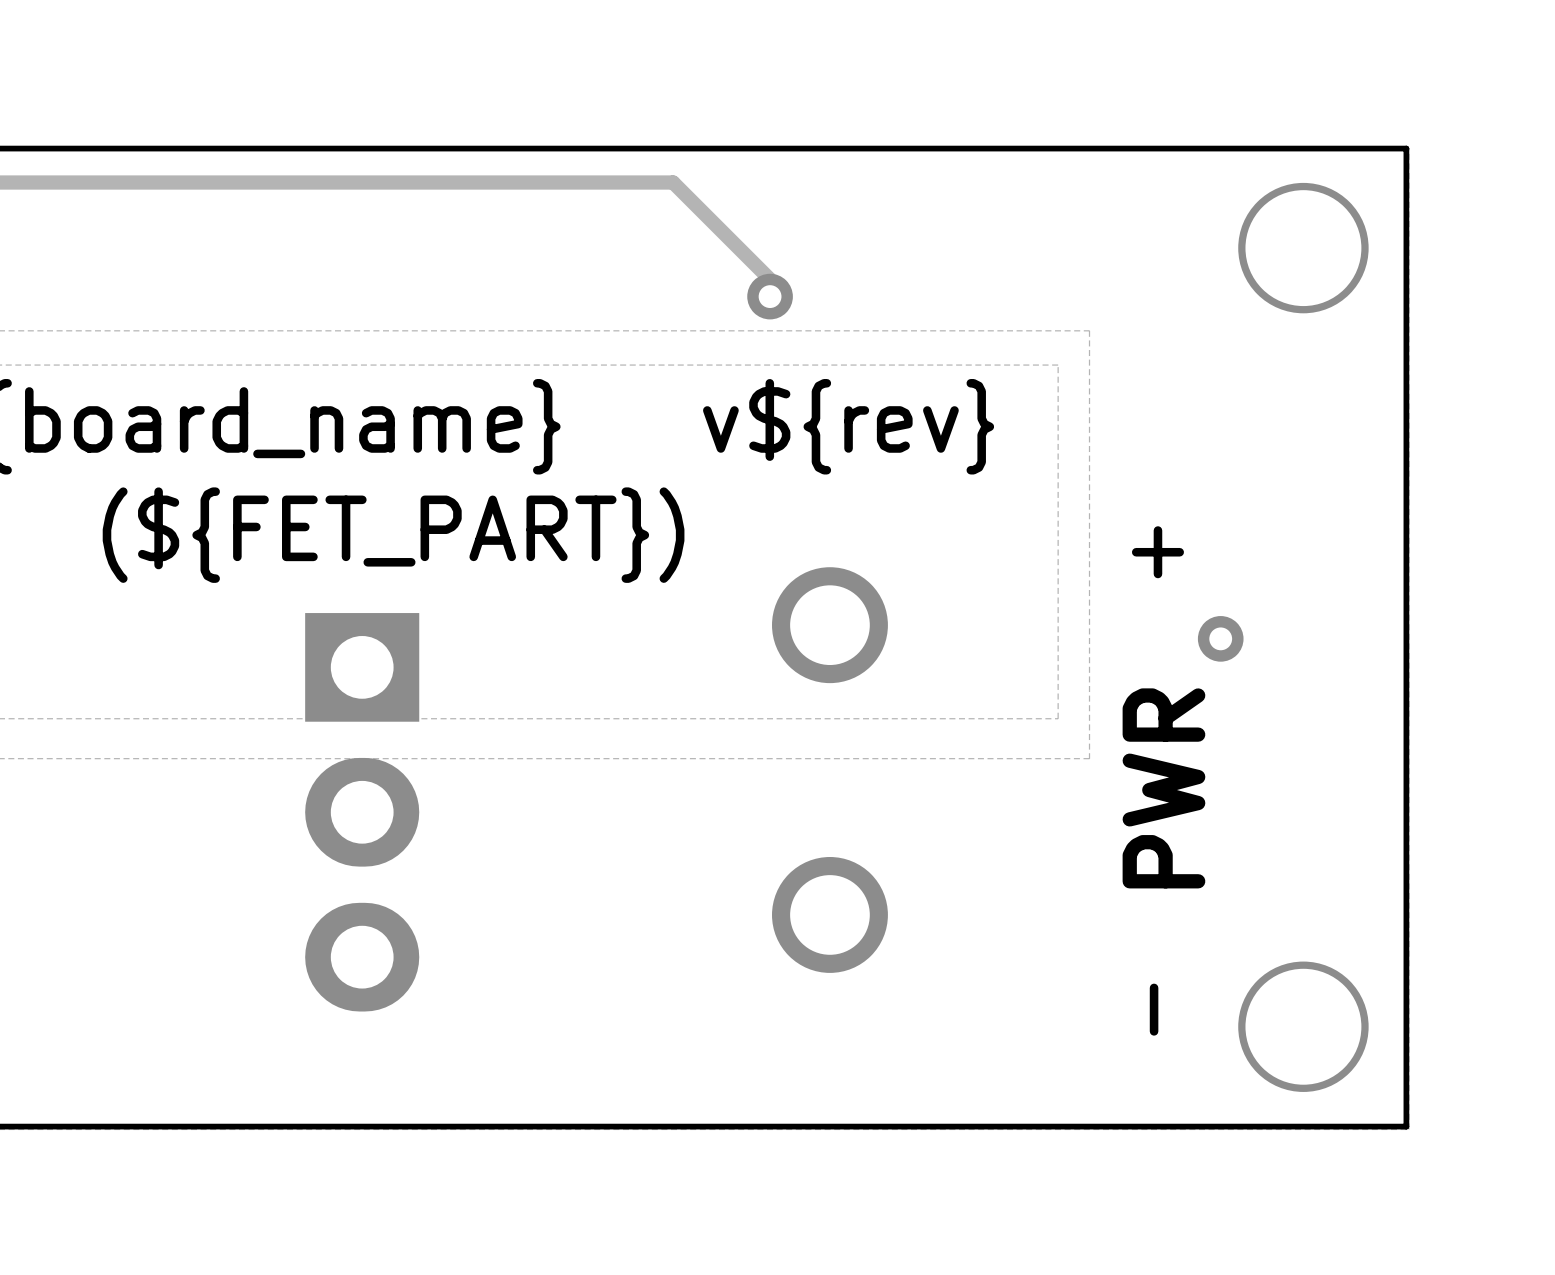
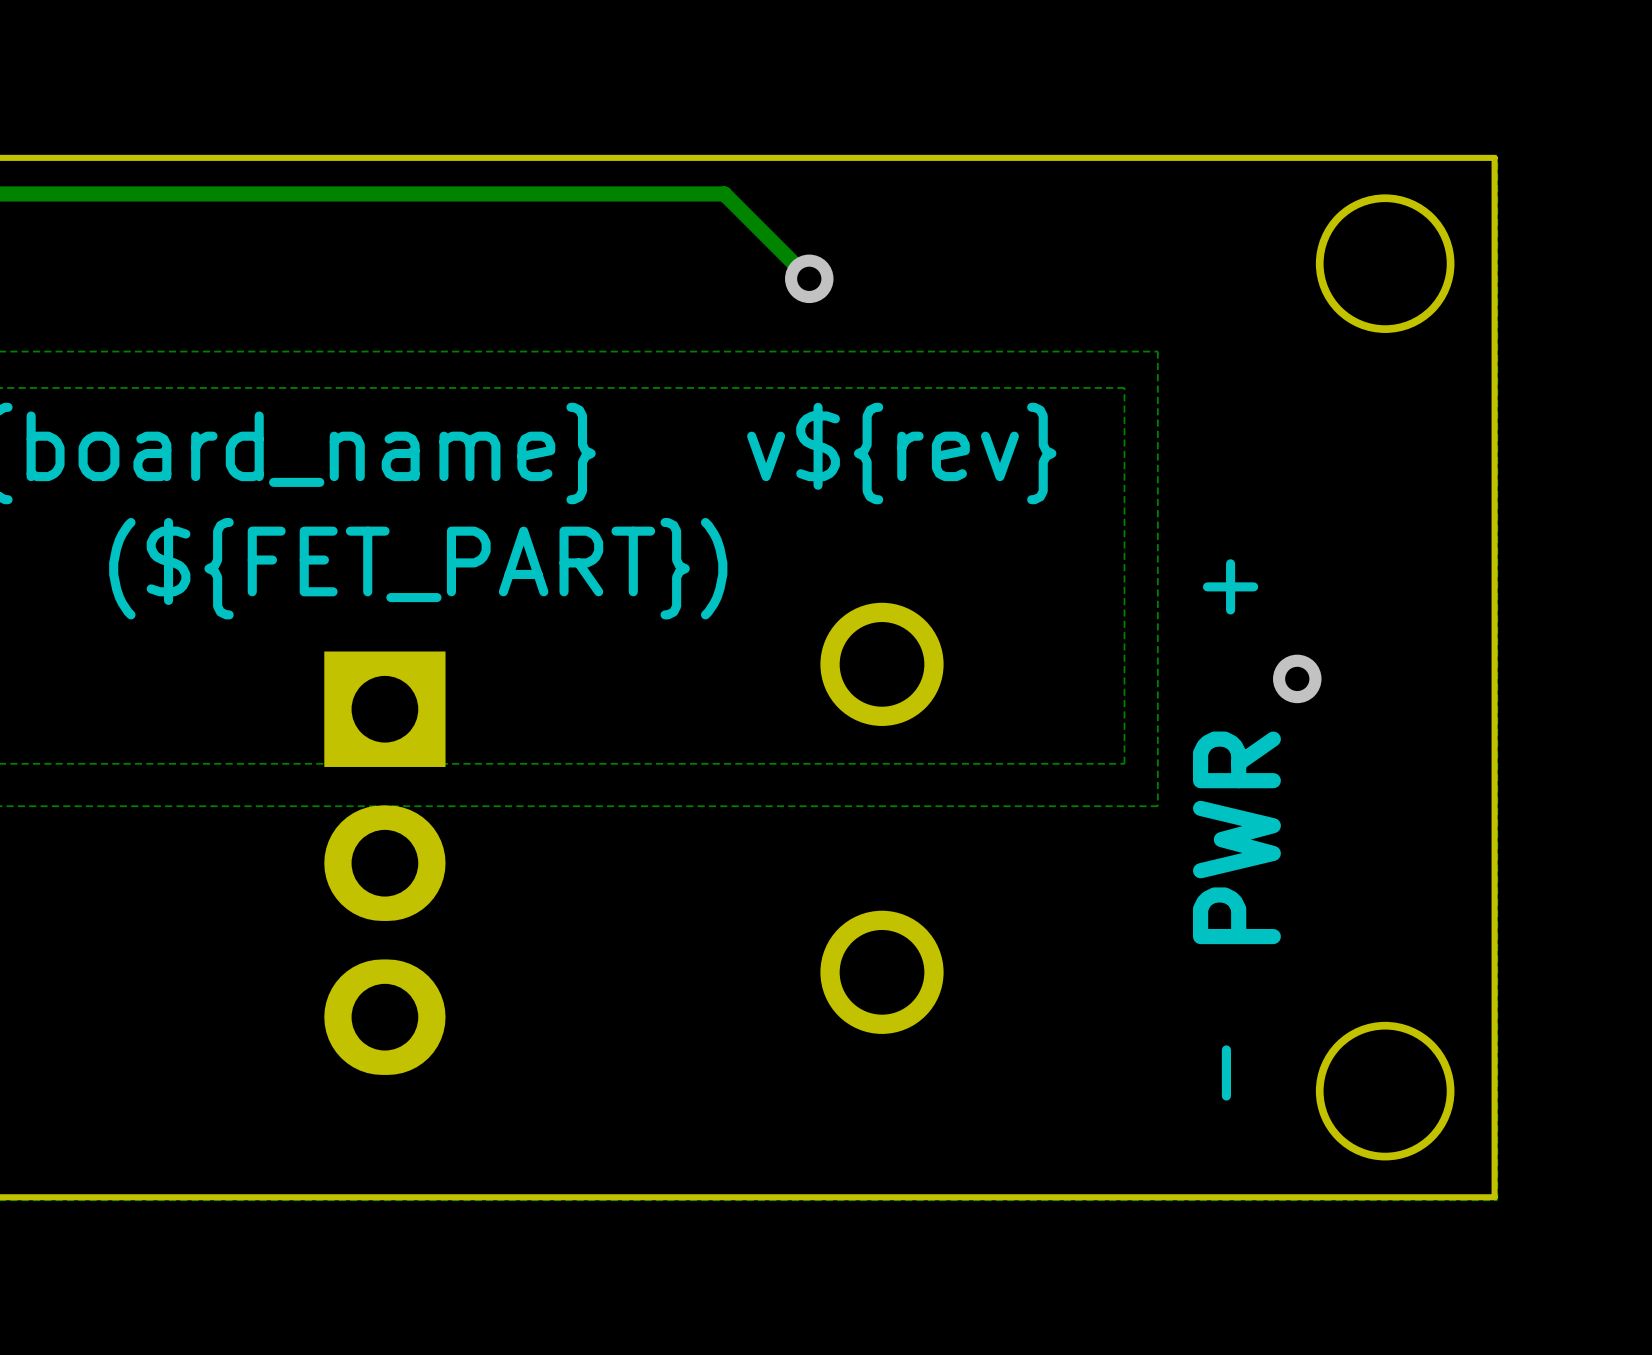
track: (673, 182) (770, 279) (770, 296) -> (715, 193) (724, 193) (809, 278)
via position: (770, 296) -> (809, 278)

